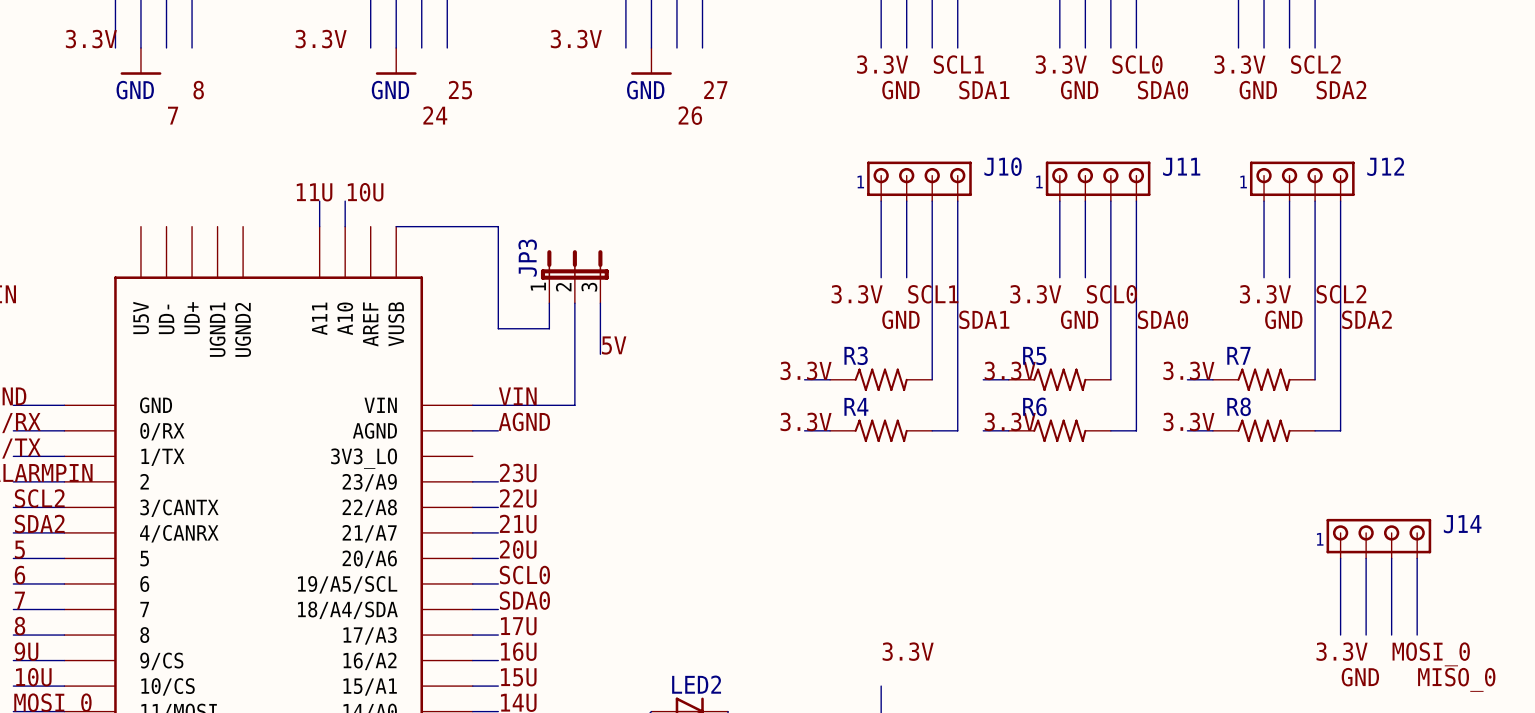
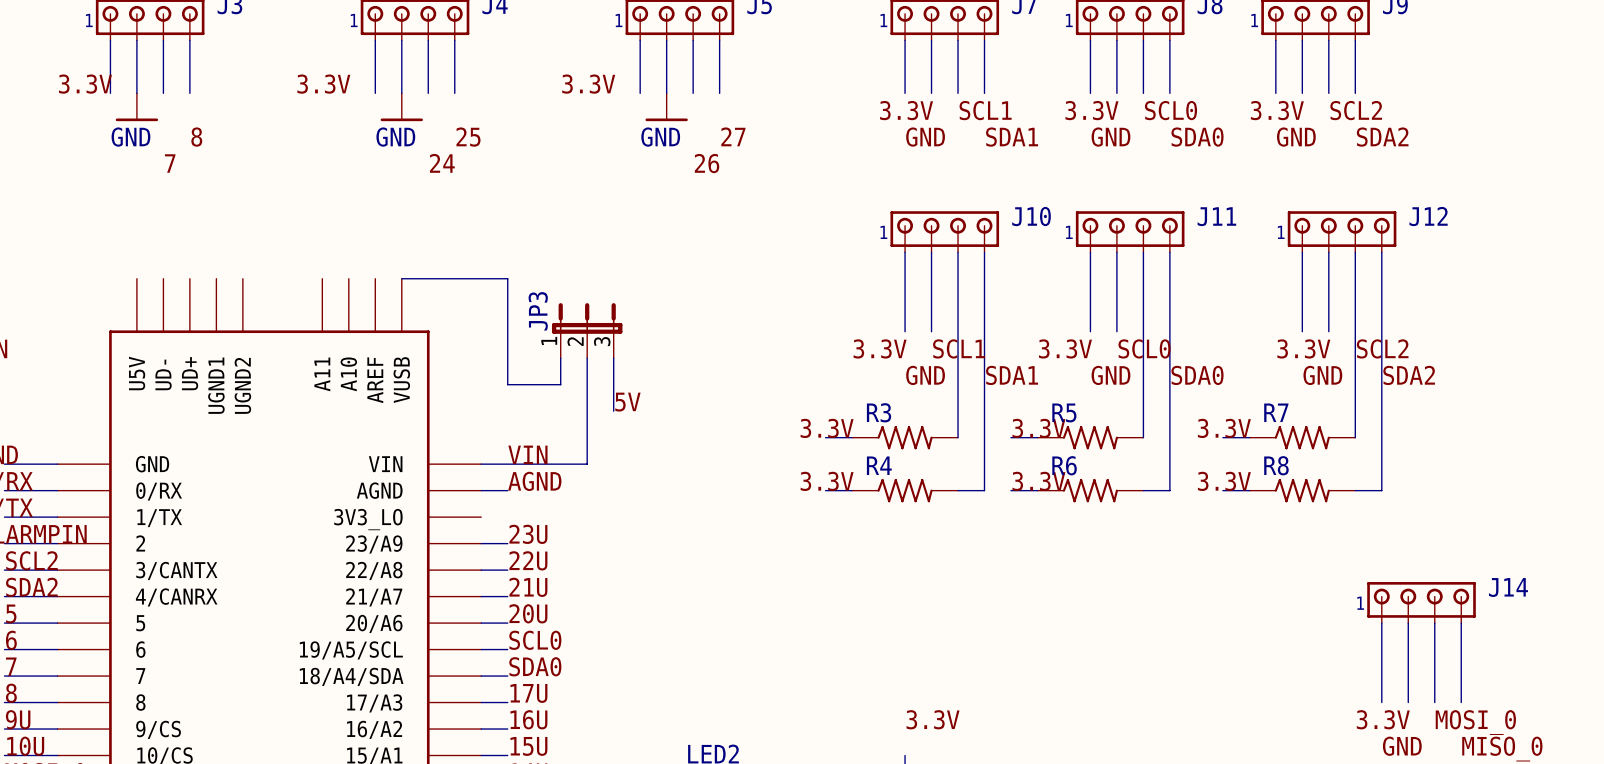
label: 11U (314, 192) -> none
label: 10U (365, 192) -> none
wire: (319, 201) (319, 226) -> none
wire: (345, 201) (345, 226) -> none

